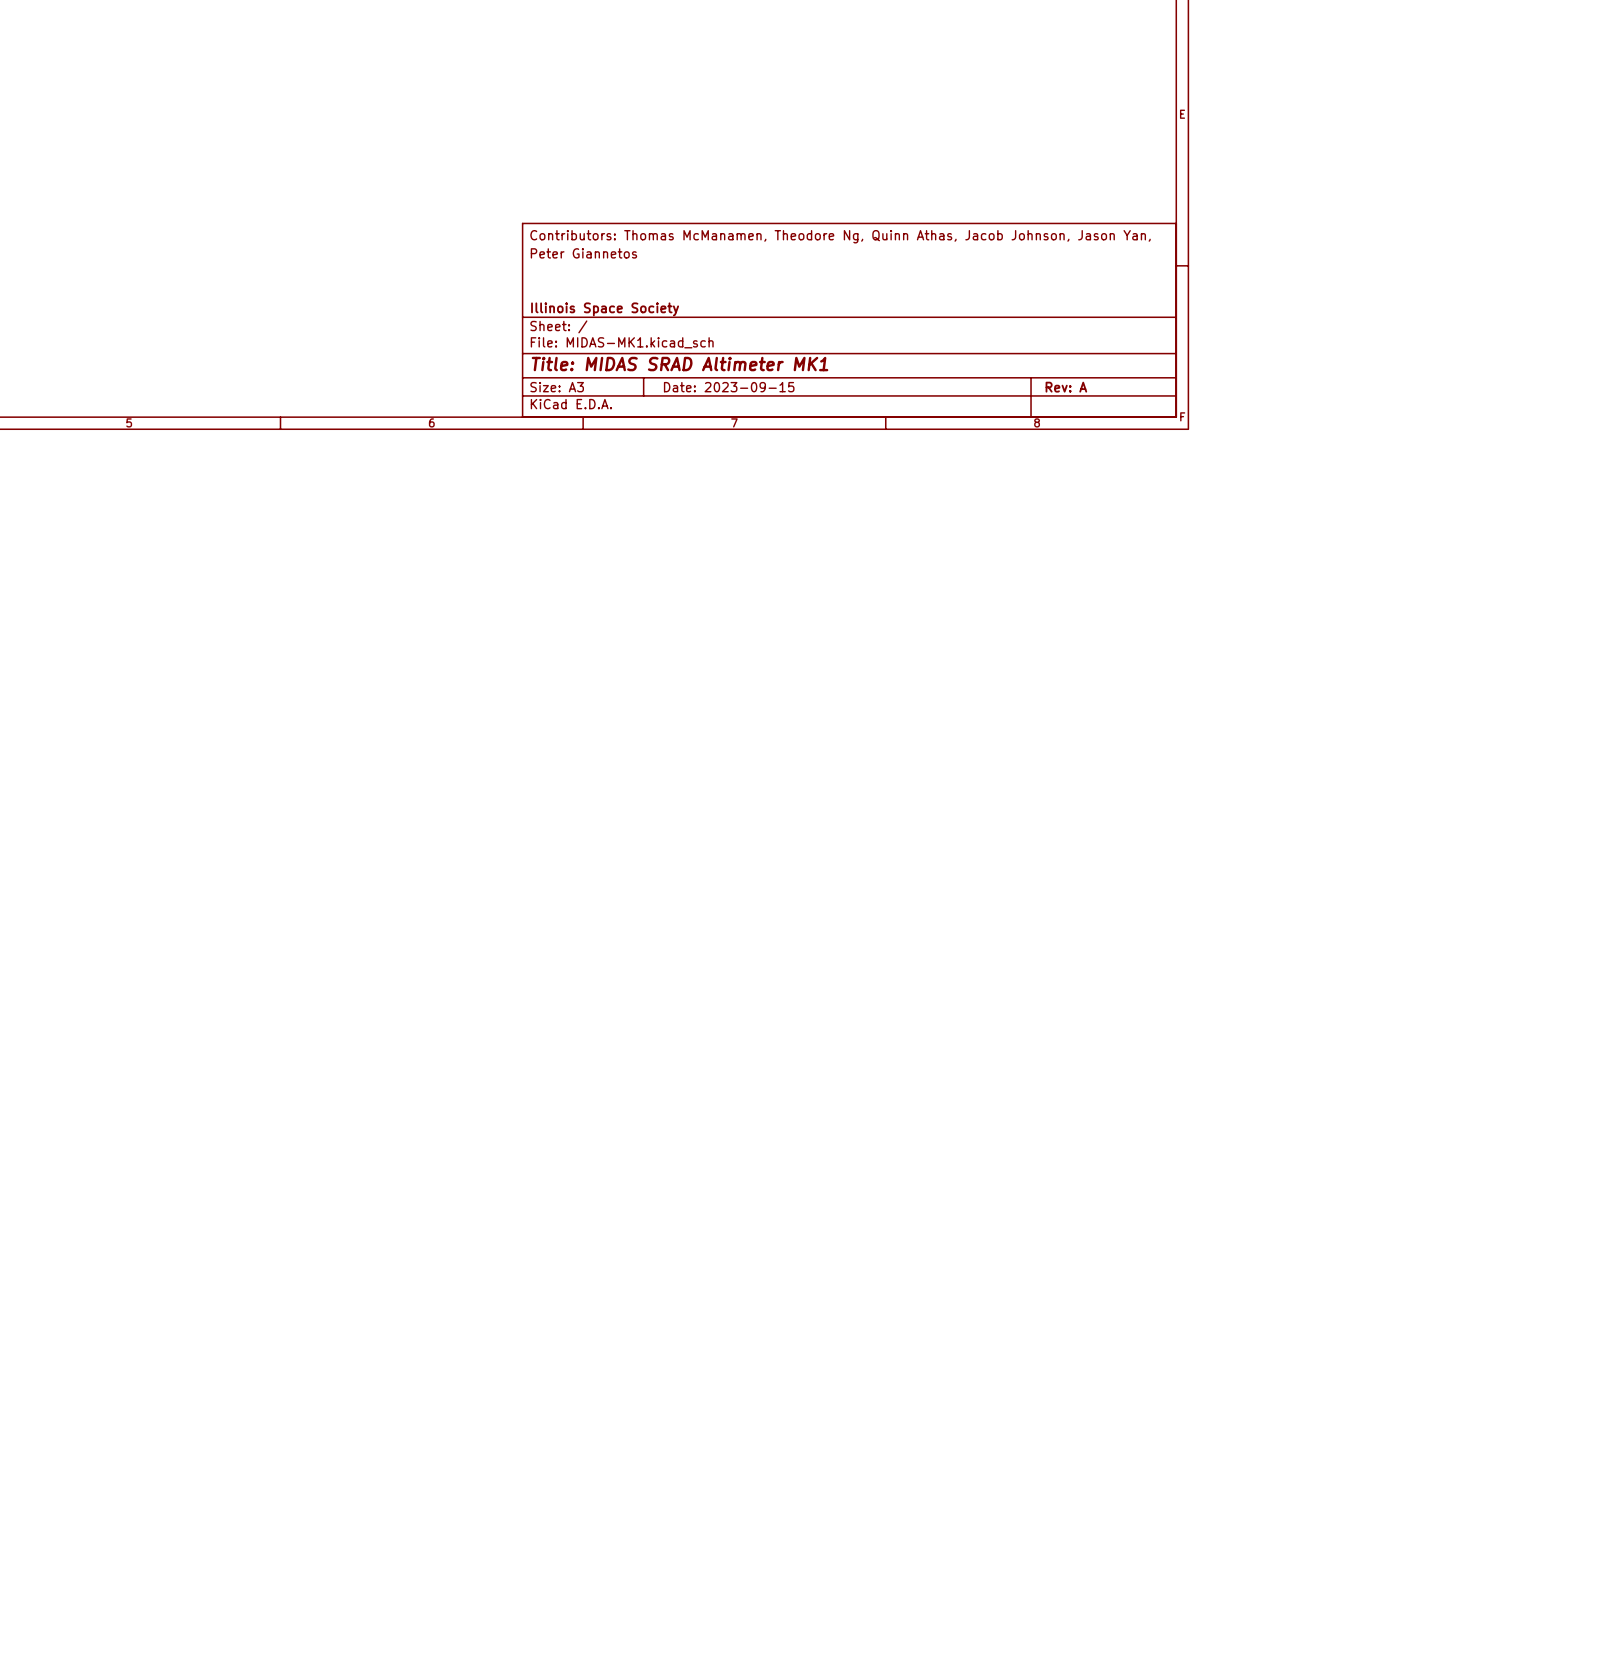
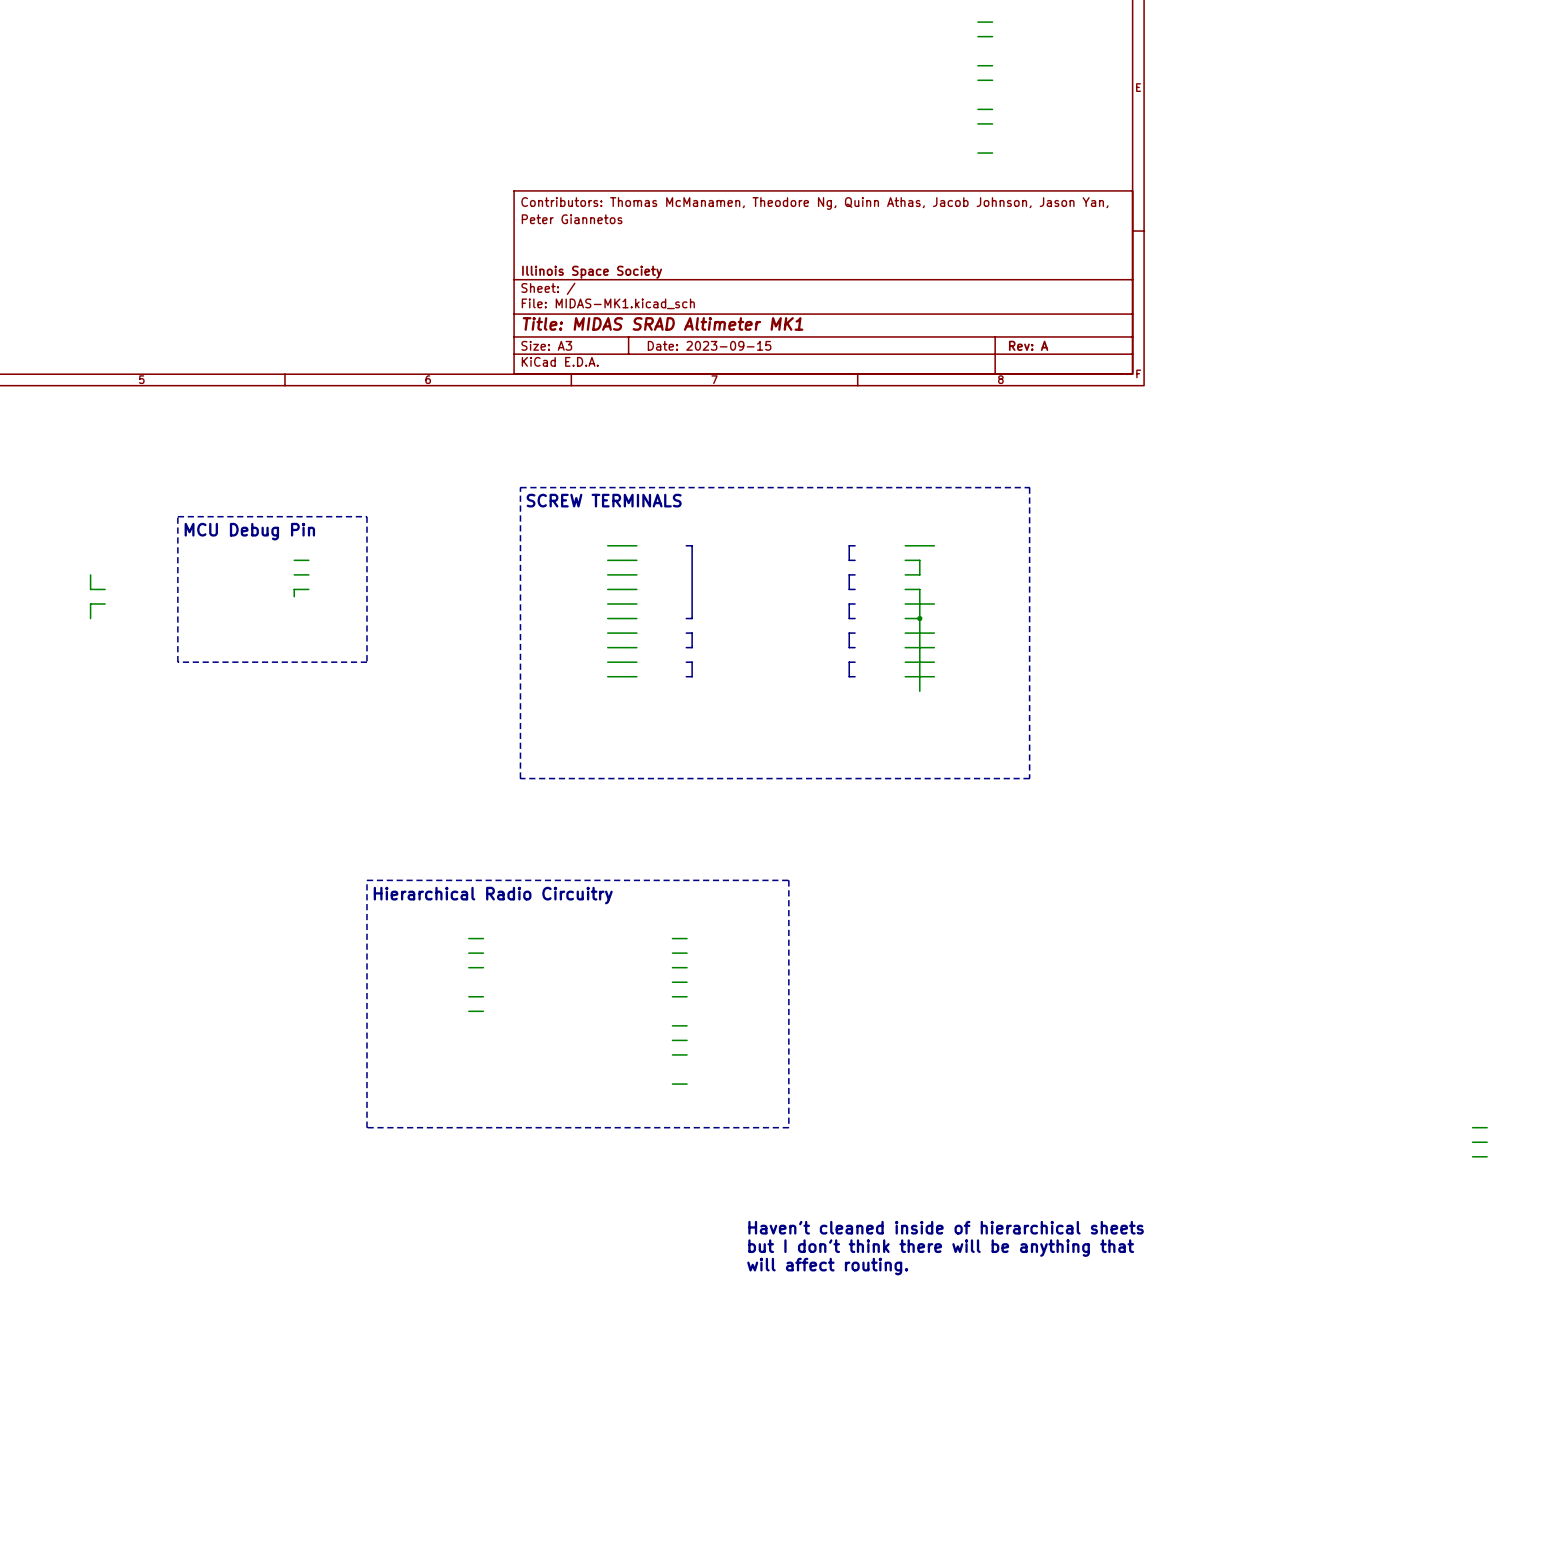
wire: none -> (977, 22) (992, 22)
wire: none -> (977, 36) (992, 36)
wire: none -> (977, 65) (992, 65)
wire: none -> (977, 80) (992, 80)
wire: none -> (977, 109) (992, 109)
wire: none -> (977, 123) (992, 123)
wire: none -> (977, 153) (992, 153)
line: none -> (520, 487) (1029, 487) (1029, 778) (520, 778) (520, 487)
text: none -> SCREW TERMINALS (604, 500)
line: none -> (177, 516) (366, 516) (366, 662) (177, 662) (177, 516)
text: none -> MCU Debug Pin (249, 531)
wire: none -> (607, 545) (636, 545)
line: none -> (686, 545) (692, 545) (692, 618) (686, 618)
line: none -> (855, 545) (849, 545) (849, 560) (855, 560)
wire: none -> (905, 545) (934, 545)
wire: none -> (294, 560) (308, 560)
wire: none -> (607, 560) (636, 560)
wire: none -> (905, 560) (919, 560) (919, 574) (905, 574)
wire: none -> (90, 574) (90, 589) (105, 589)
wire: none -> (294, 574) (308, 574)
wire: none -> (607, 574) (636, 574)
line: none -> (855, 574) (849, 574) (849, 589) (855, 589)
wire: none -> (308, 589) (294, 589) (294, 596)
wire: none -> (607, 589) (636, 589)
wire: none -> (905, 589) (919, 589) (919, 691)
wire: none -> (105, 603) (90, 603) (90, 618)
wire: none -> (607, 603) (636, 603)
line: none -> (855, 603) (849, 603) (849, 618) (855, 618)
wire: none -> (905, 603) (934, 603)
wire: none -> (607, 618) (636, 618)
wire: none -> (905, 618) (919, 618)
junction: none -> (919, 618)
wire: none -> (607, 633) (636, 633)
line: none -> (686, 633) (692, 633) (692, 647) (686, 647)
line: none -> (855, 633) (849, 633) (849, 647) (855, 647)
wire: none -> (905, 633) (934, 633)
wire: none -> (607, 647) (636, 647)
wire: none -> (905, 647) (934, 647)
wire: none -> (607, 662) (636, 662)
line: none -> (686, 662) (692, 662) (692, 676) (686, 676)
line: none -> (855, 662) (849, 662) (849, 676) (855, 676)
wire: none -> (905, 662) (934, 662)
wire: none -> (607, 676) (636, 676)
wire: none -> (905, 676) (934, 676)
line: none -> (366, 880) (366, 1127) (788, 1127) (788, 880) (366, 880)
text: none -> Hierarchical Radio Circuitry (493, 895)
wire: none -> (468, 938) (483, 938)
wire: none -> (672, 938) (687, 938)
wire: none -> (468, 953) (483, 953)
wire: none -> (672, 953) (687, 953)
wire: none -> (468, 967) (483, 967)
wire: none -> (672, 967) (687, 967)
wire: none -> (672, 982) (687, 982)
wire: none -> (468, 996) (483, 996)
wire: none -> (672, 996) (687, 996)
wire: none -> (468, 1011) (483, 1011)
wire: none -> (672, 1025) (687, 1025)
wire: none -> (672, 1040) (687, 1040)
wire: none -> (672, 1054) (687, 1054)
wire: none -> (672, 1084) (687, 1084)
wire: none -> (1472, 1127) (1487, 1127)
wire: none -> (1472, 1142) (1487, 1142)
wire: none -> (1472, 1156) (1487, 1156)
text: none -> Haven't cleaned inside of hierarchical sheets (946, 1227)
text: none -> but I don't think there will be anything that (941, 1248)
text: none -> will affect routing. (827, 1266)

